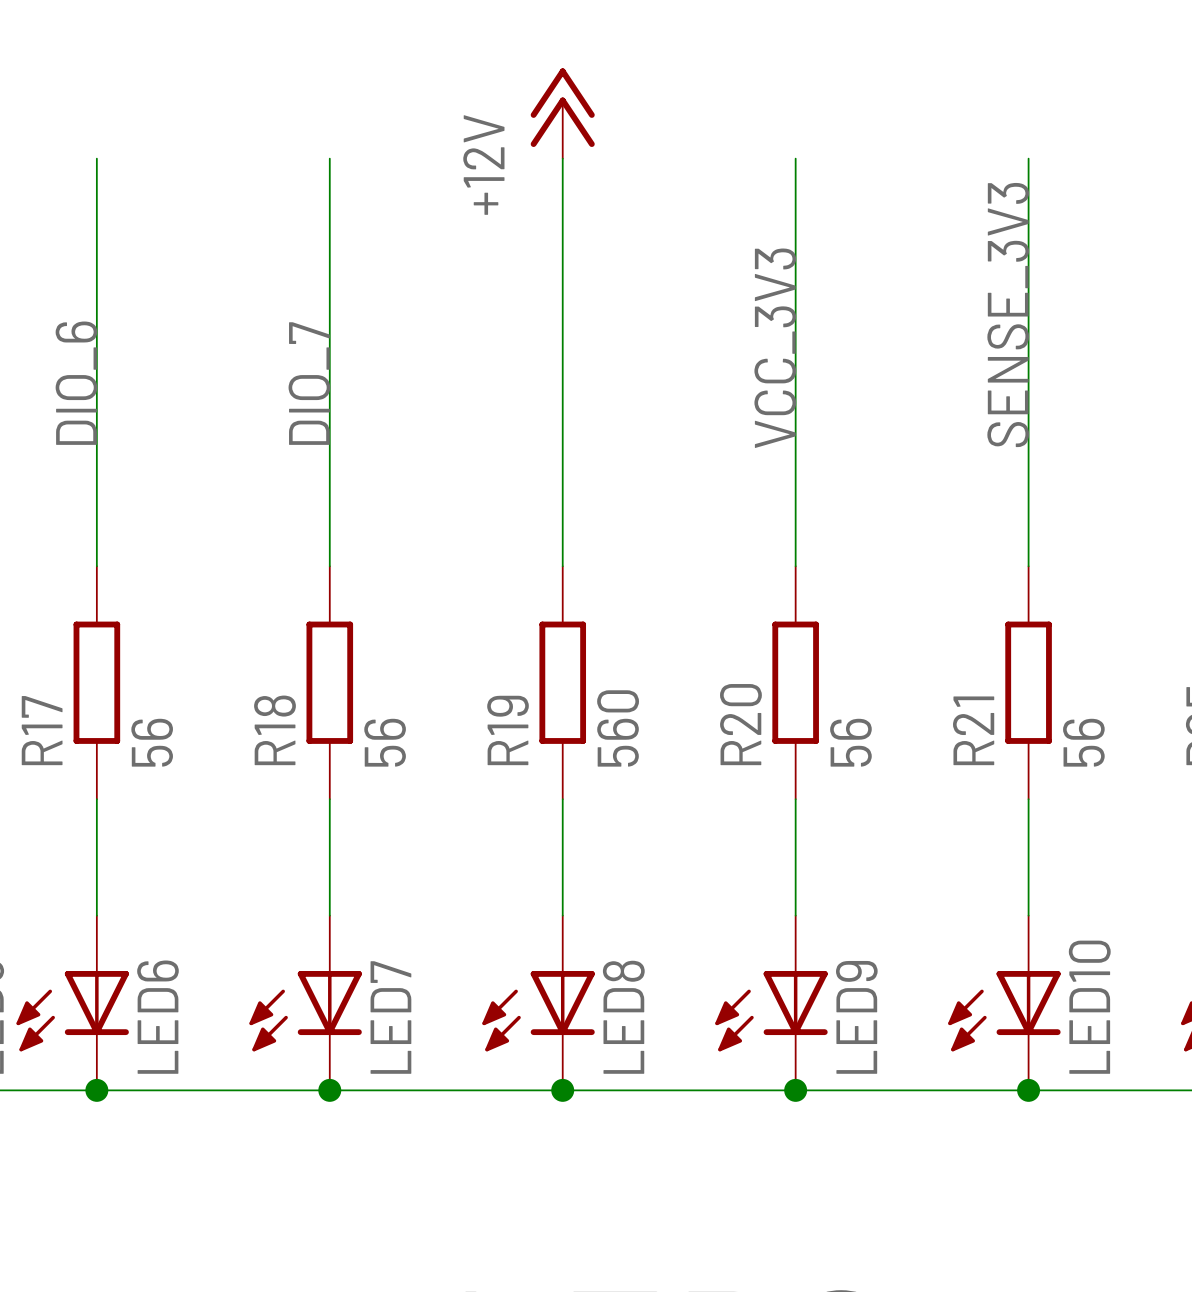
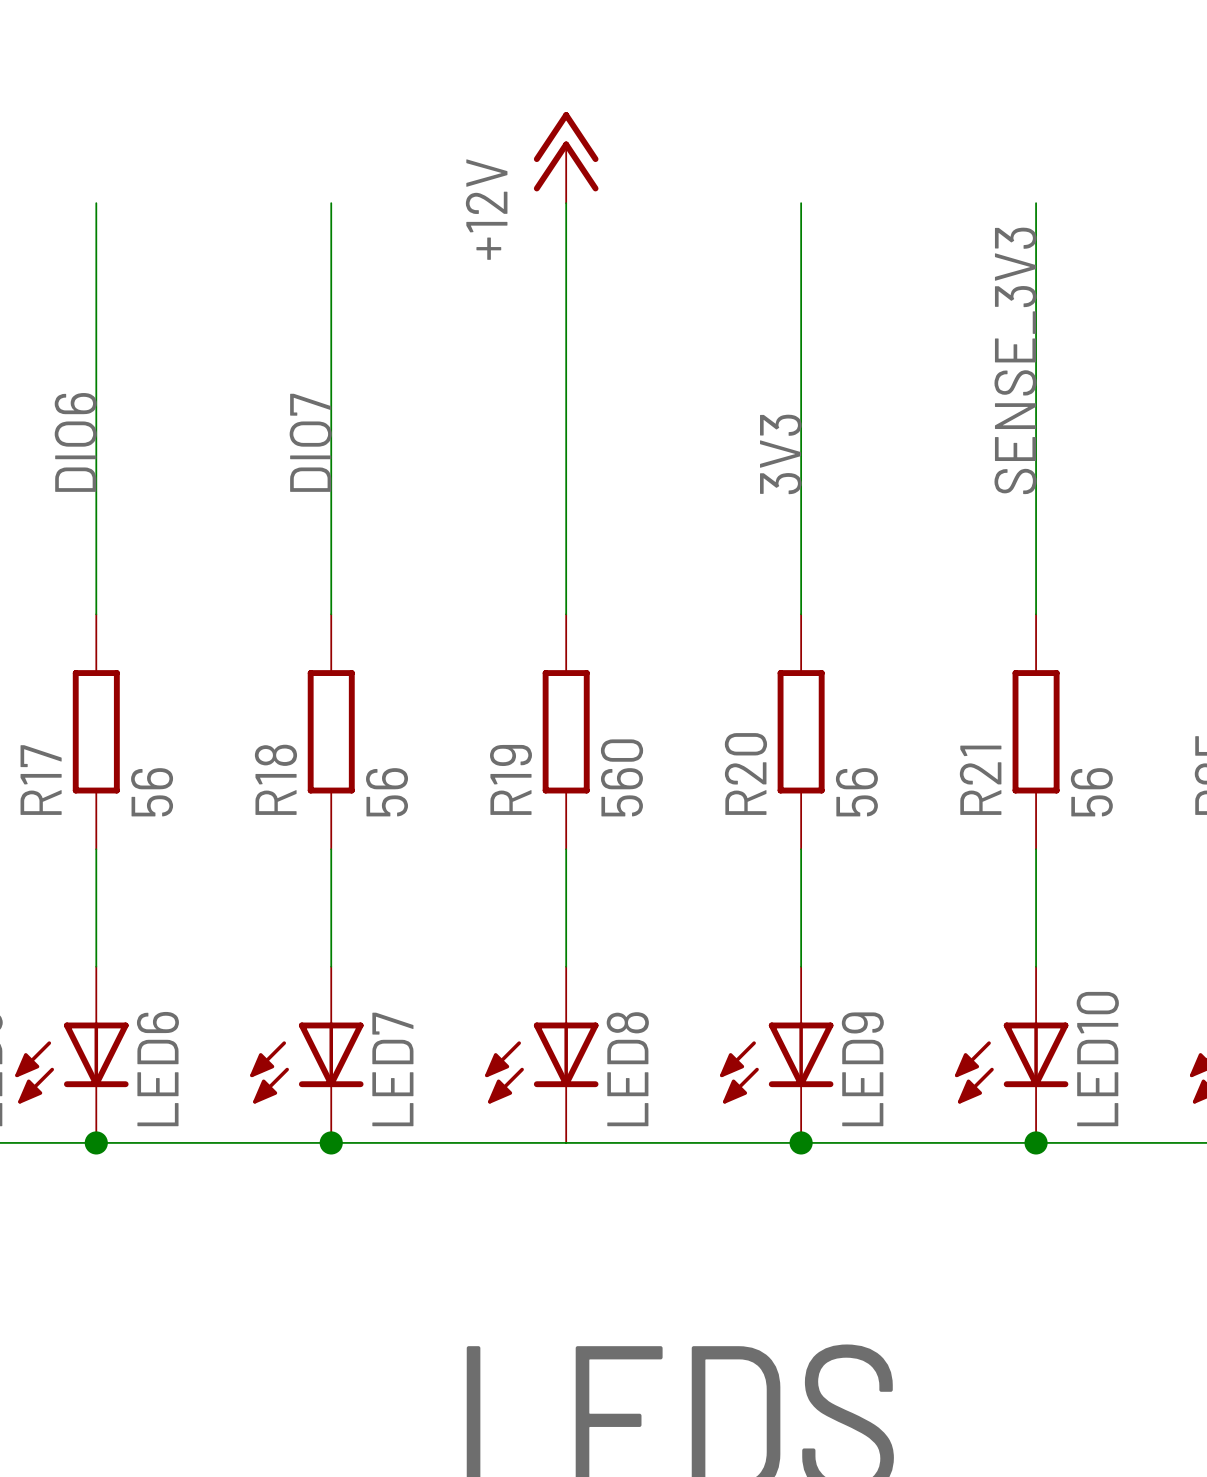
label: VCC_3V3 (775, 348) -> 3V3 (780, 454)
label: DIO_6 (76, 383) -> DIO6 (75, 442)
label: DIO_7 (309, 383) -> DIO7 (310, 442)
junction: (562, 1090) -> none

